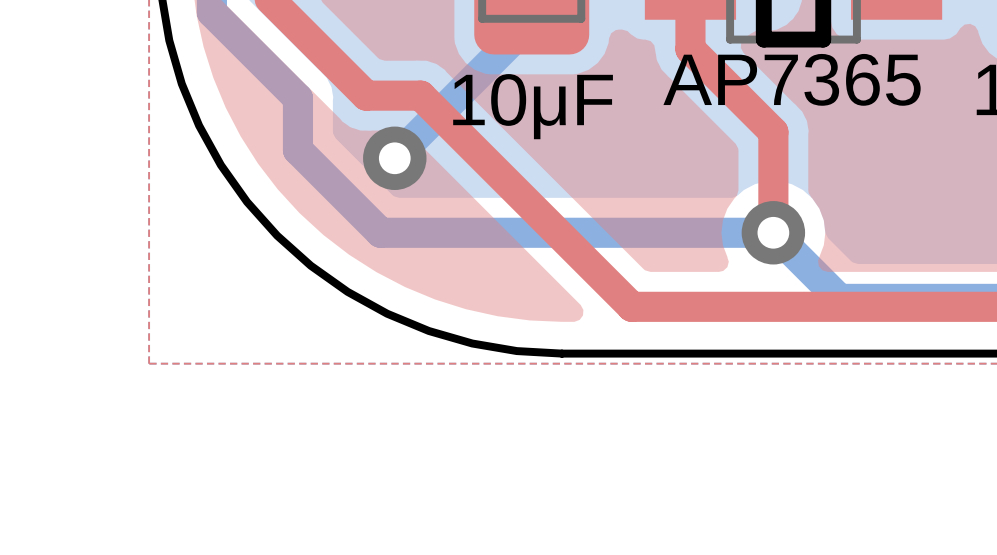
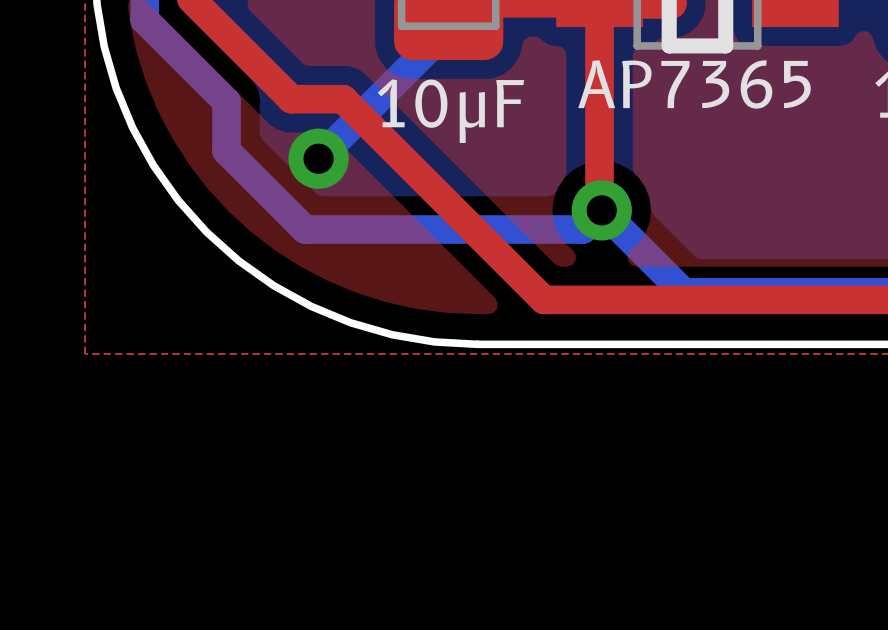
top track: (690, 49) (773, 132) (773, 232) -> (599, 55) (599, 208) (601, 210)
bottom track: (672, 232) (773, 232) (839, 298) -> (582, 229) (601, 210) (683, 292) (741, 292)
via position: (773, 232) -> (601, 210)

